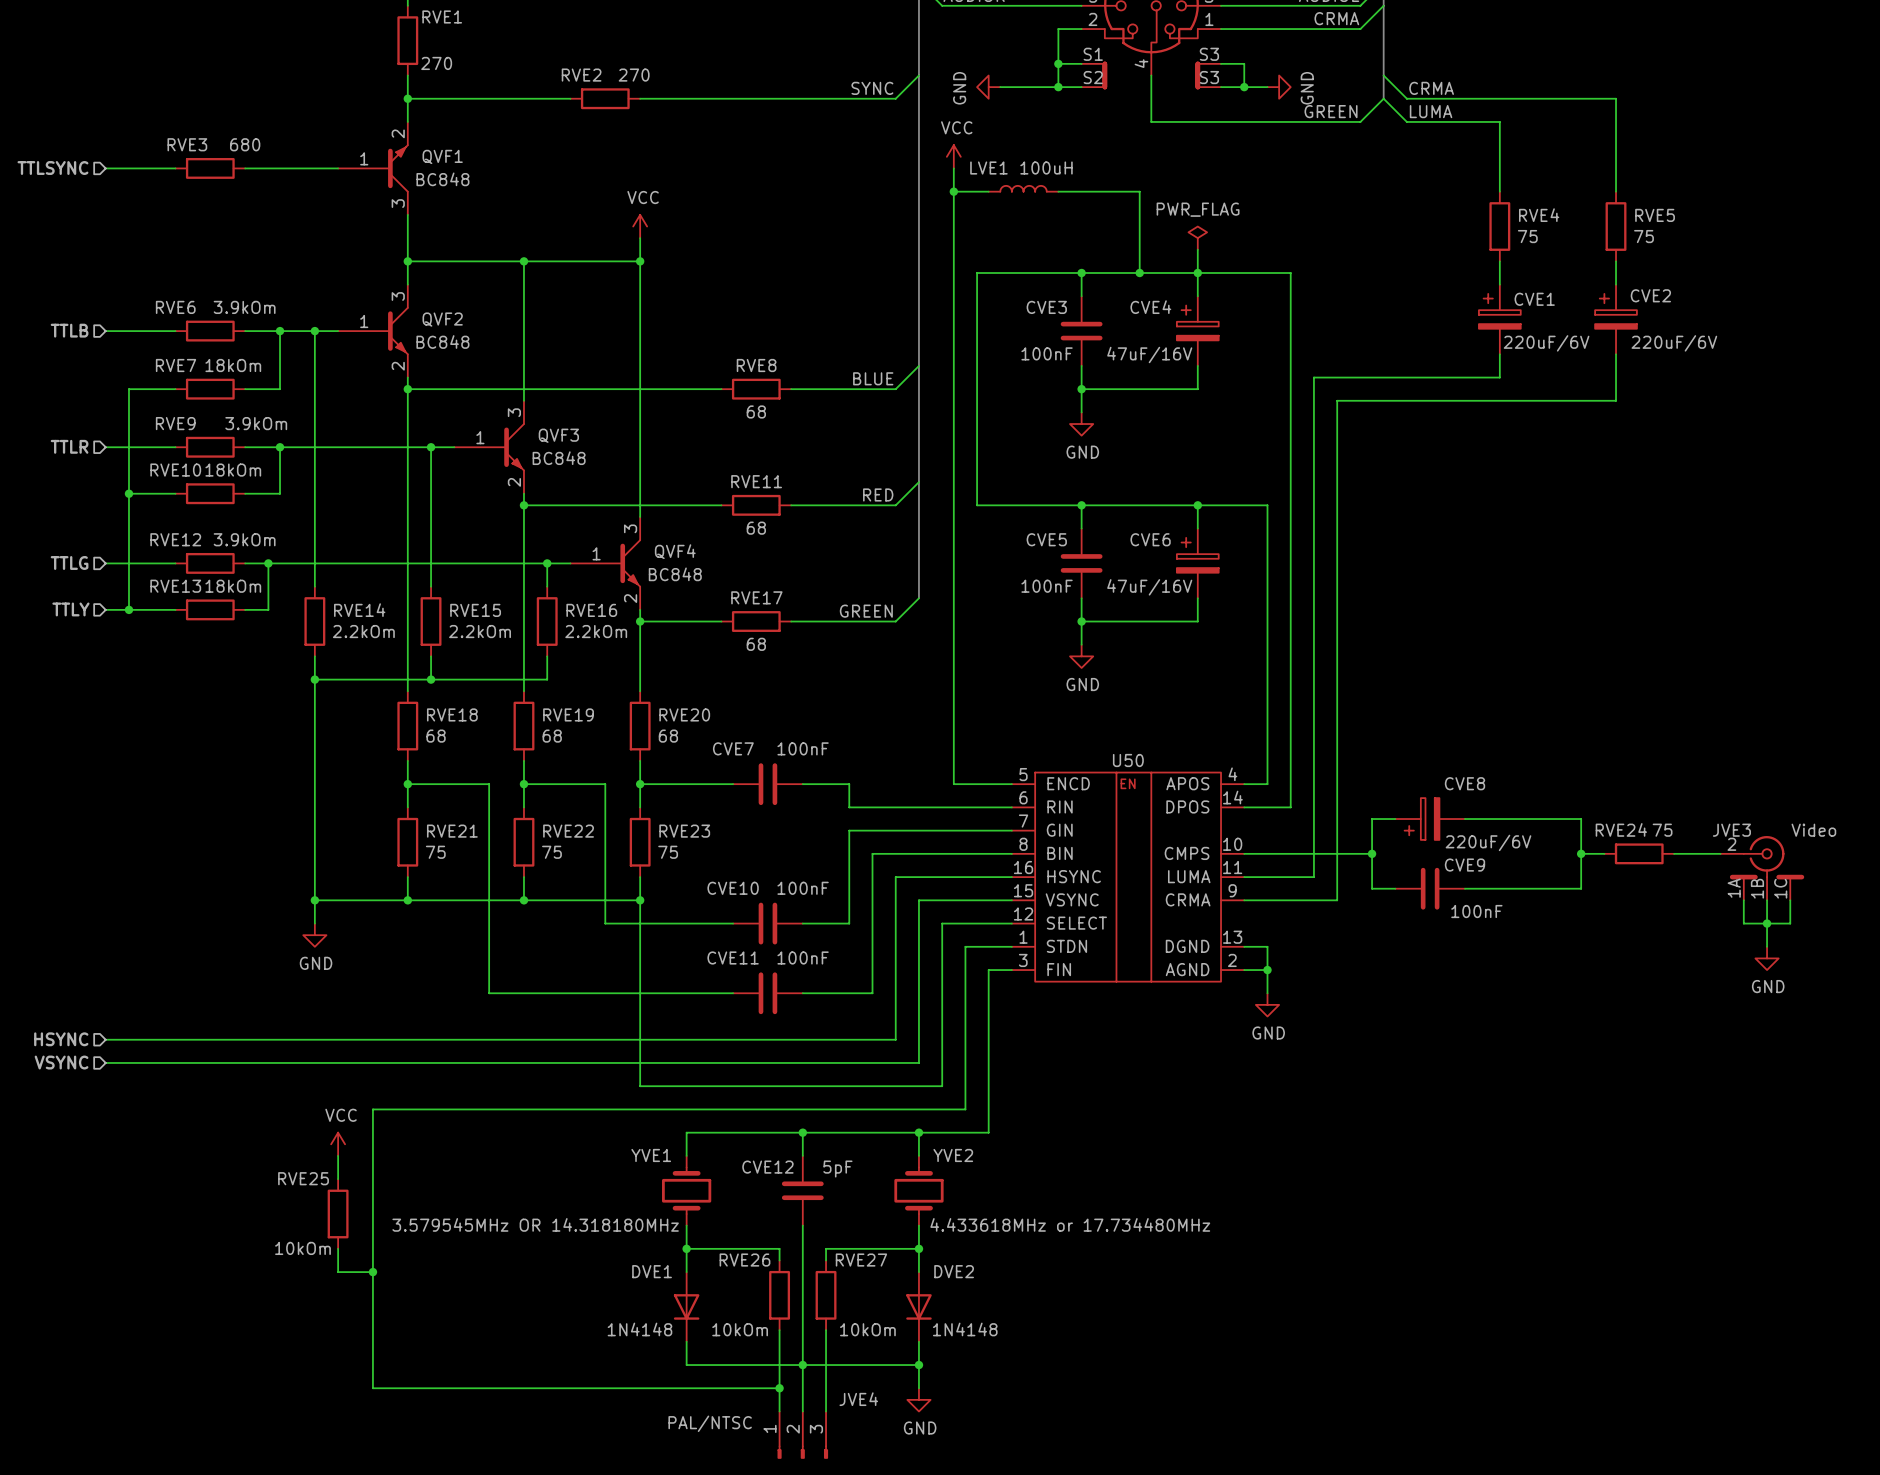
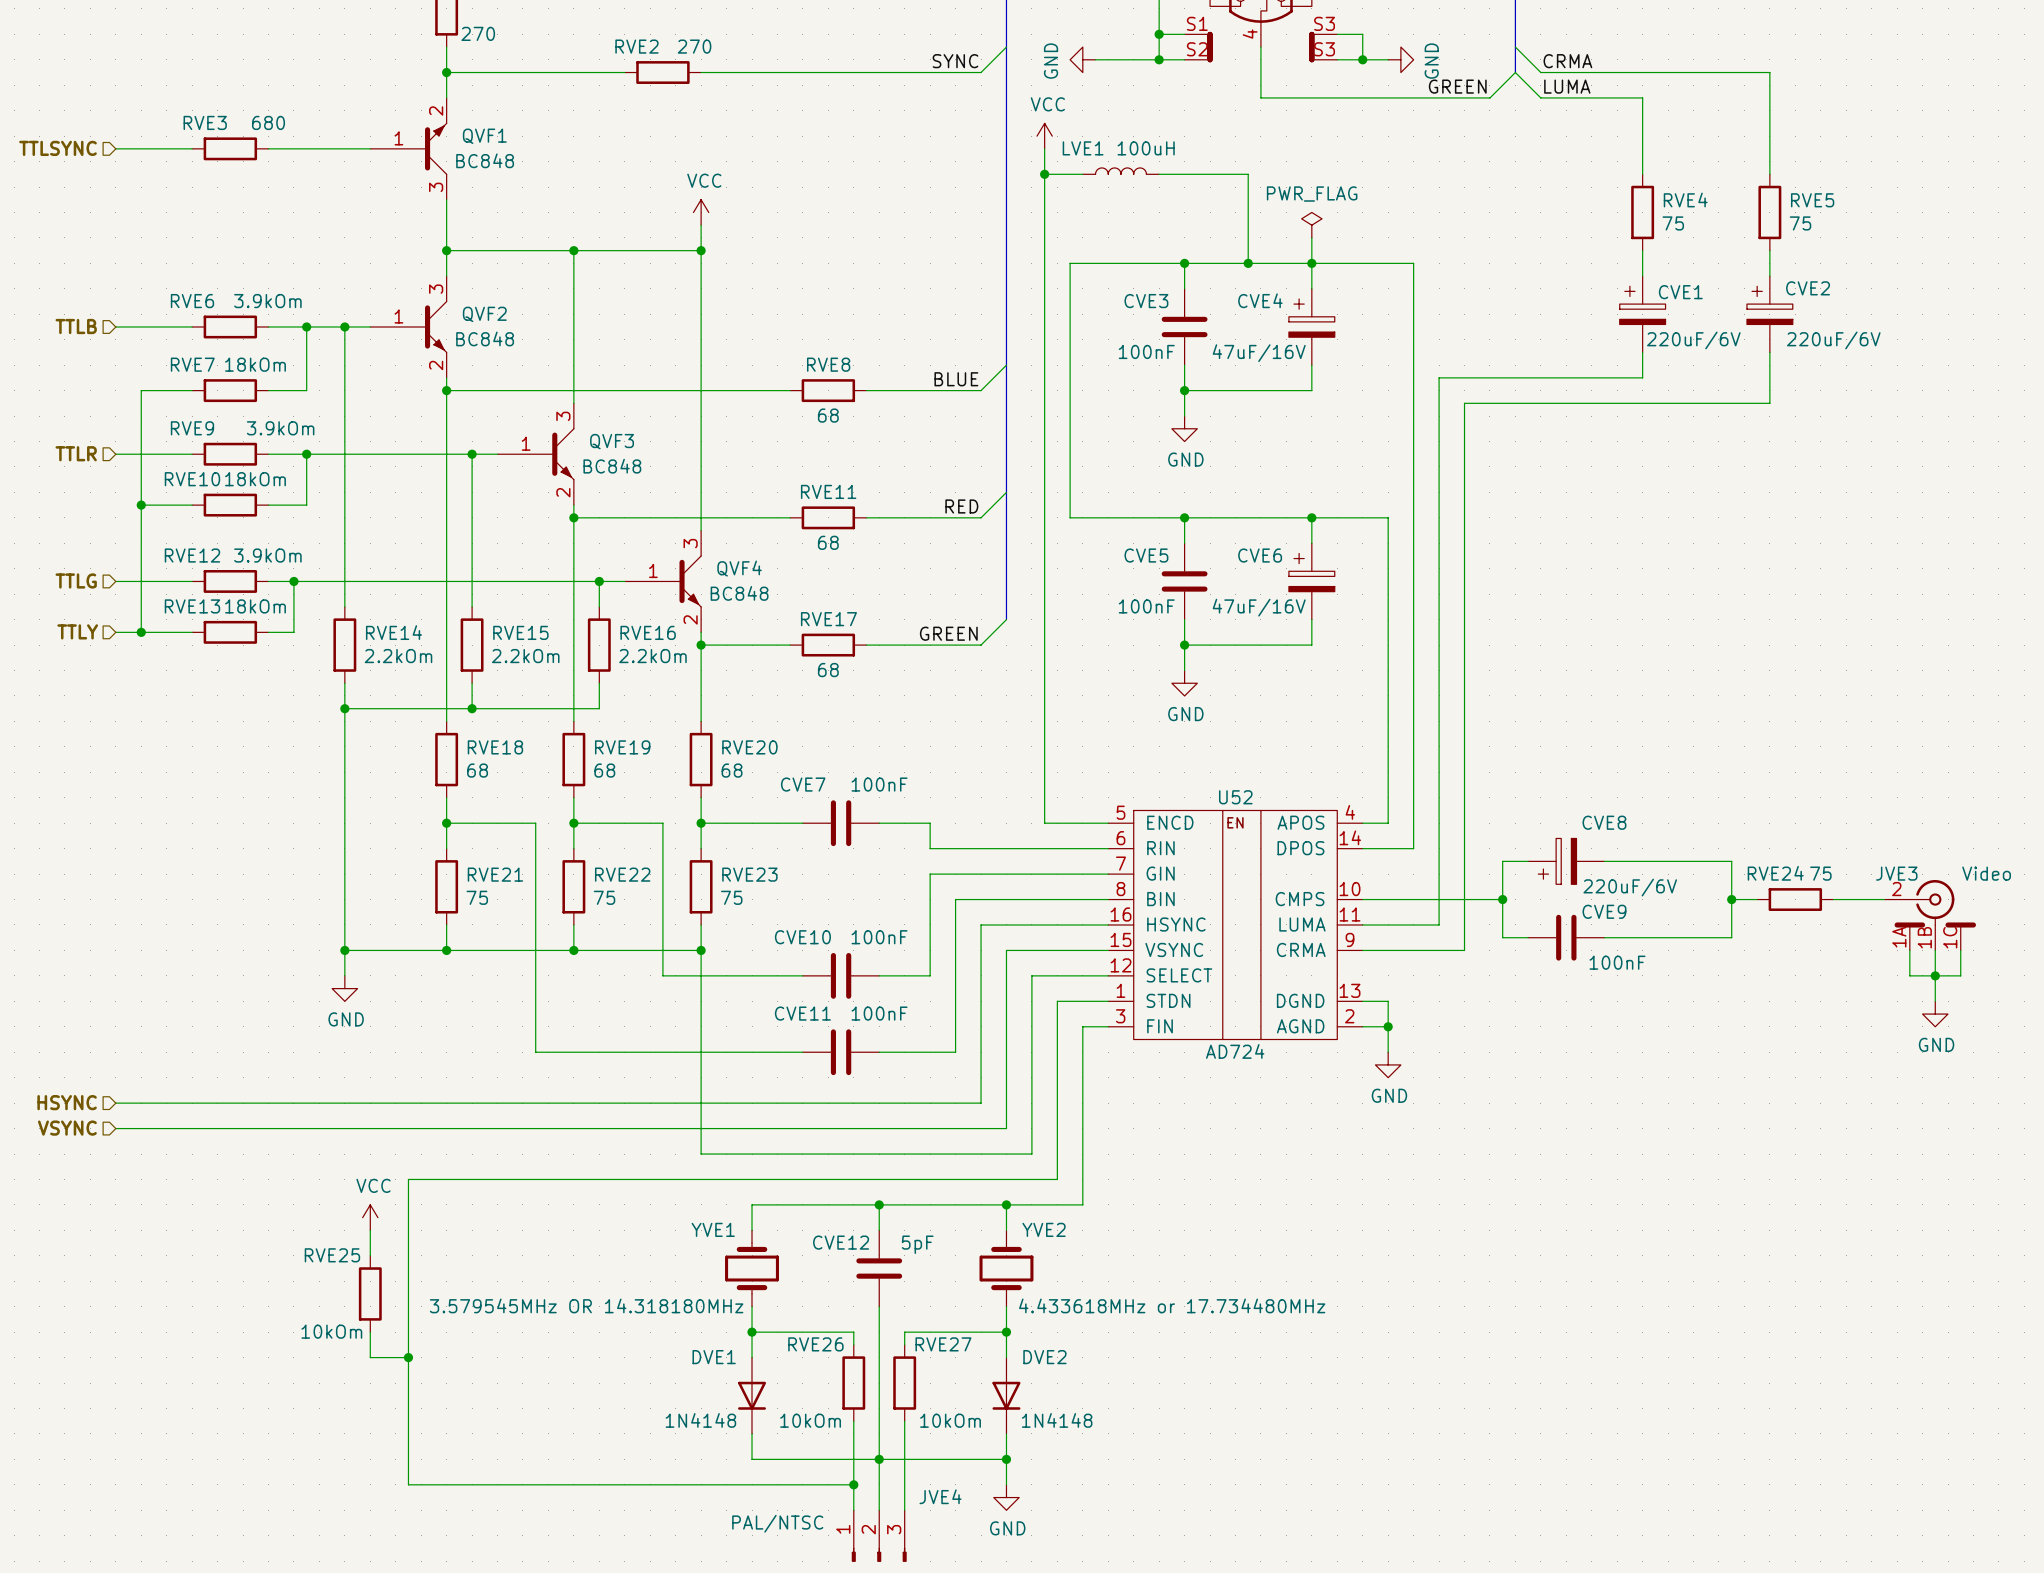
U50 name: U50 (1128, 760) -> U52 (1235, 797)
U50 value: none -> AD724 (1235, 1051)

